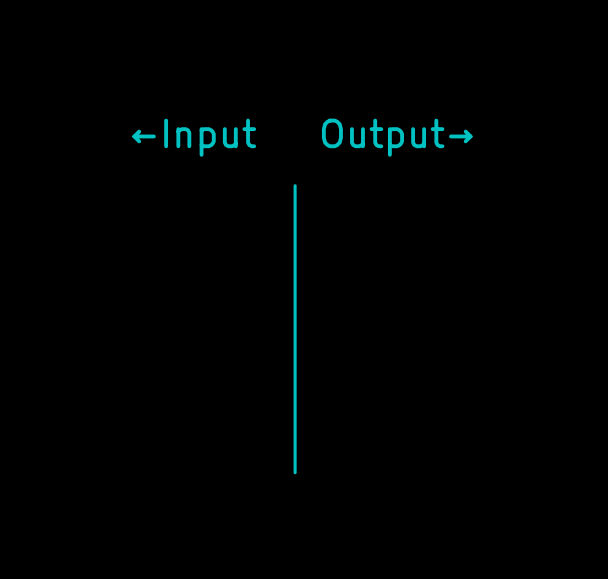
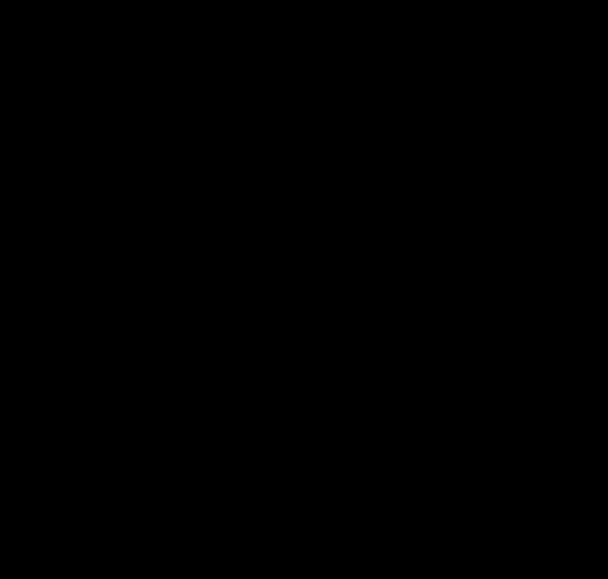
text: ←Input (194, 137) -> none
text: Output→ (397, 137) -> none
line: (295, 185) (295, 472) -> none

